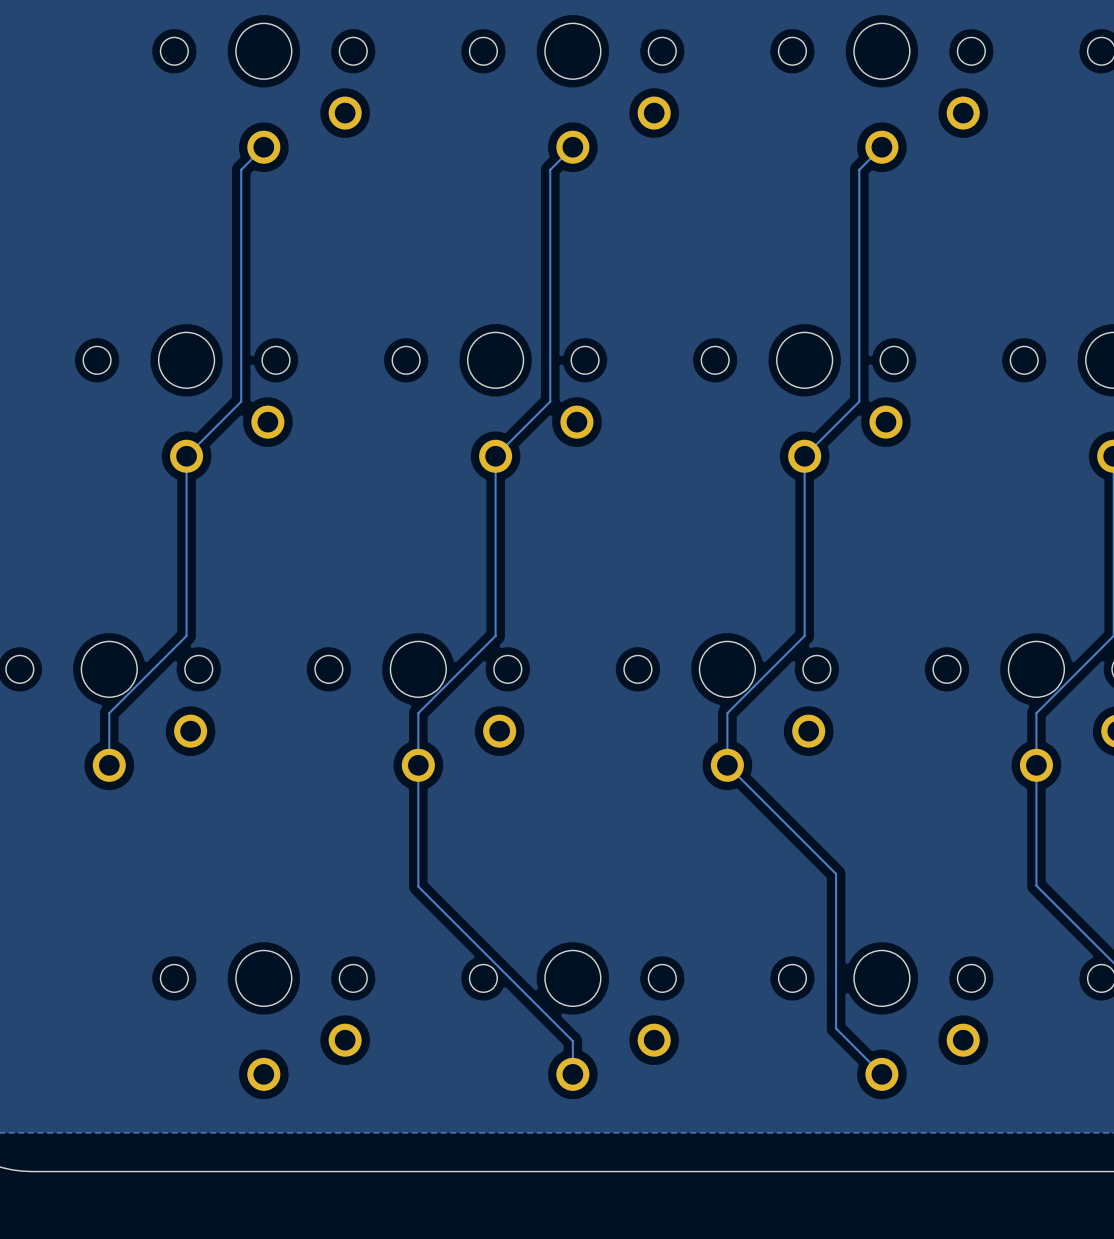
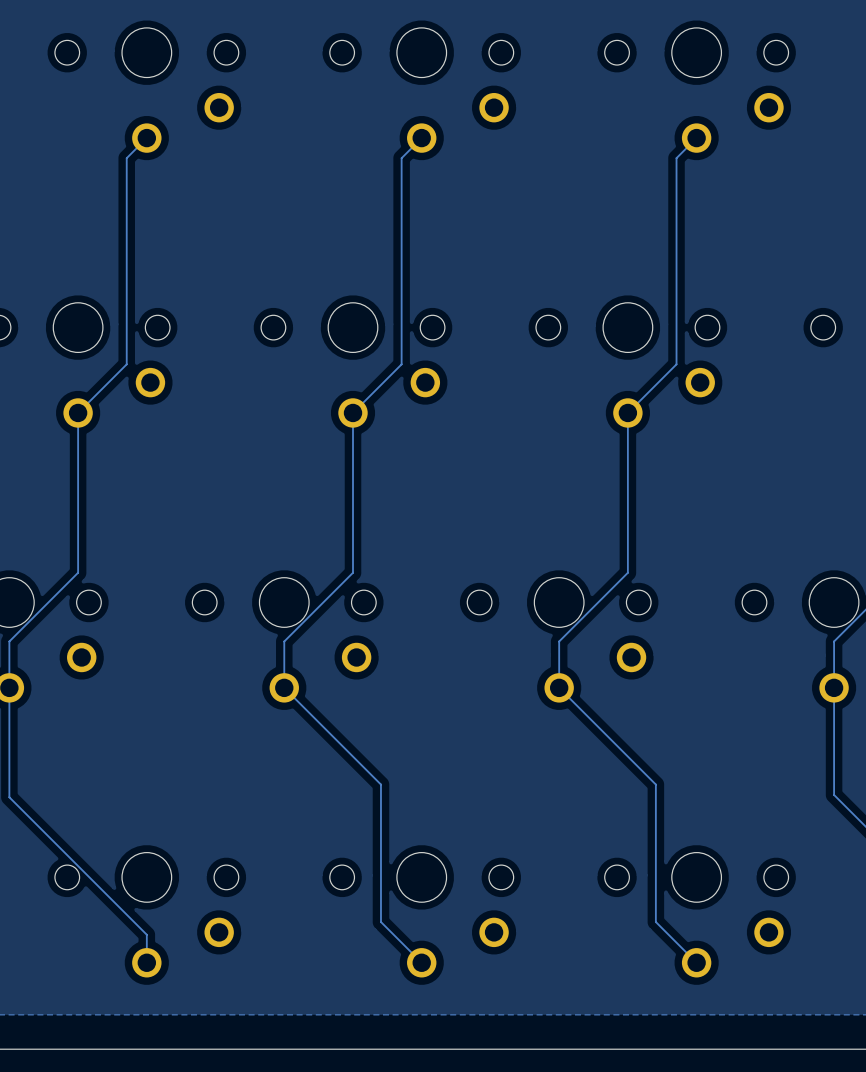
track: none -> (9, 687) (9, 797) (146, 934) (146, 962)
track: (418, 765) (418, 886) (572, 1041) (572, 1074) -> (284, 687) (380, 784) (380, 922) (421, 962)

